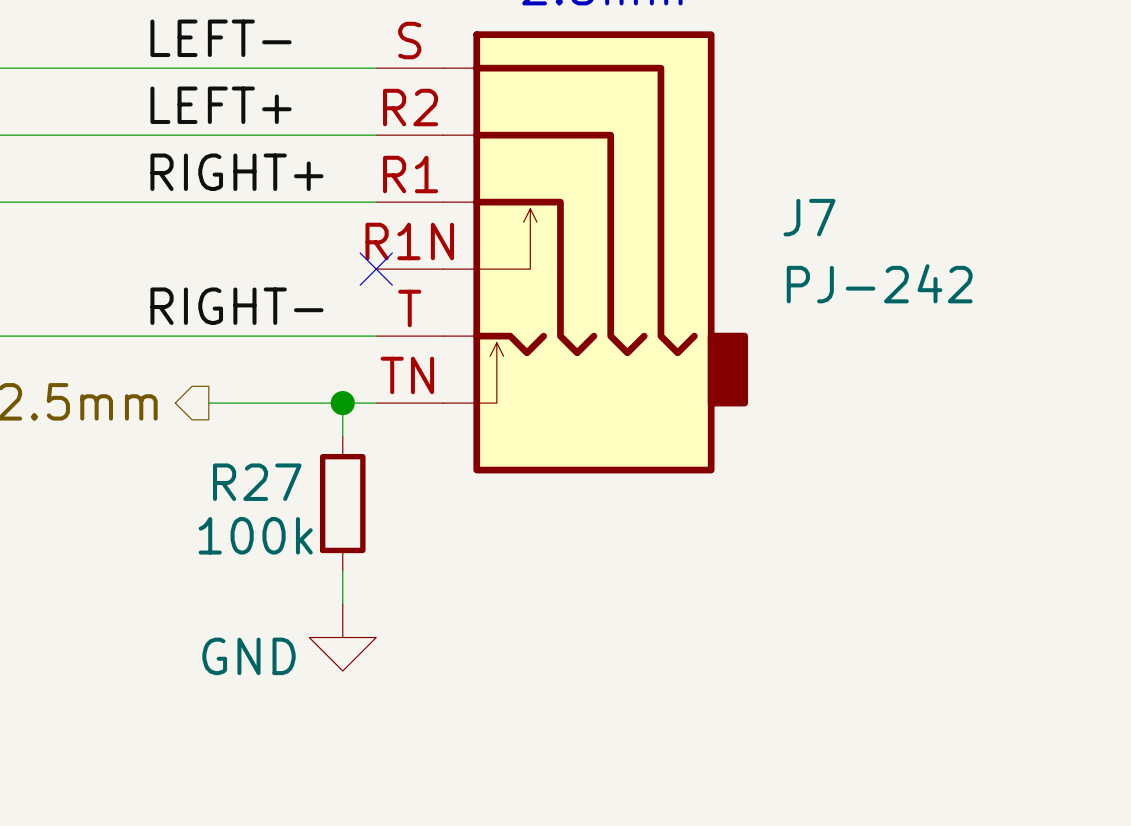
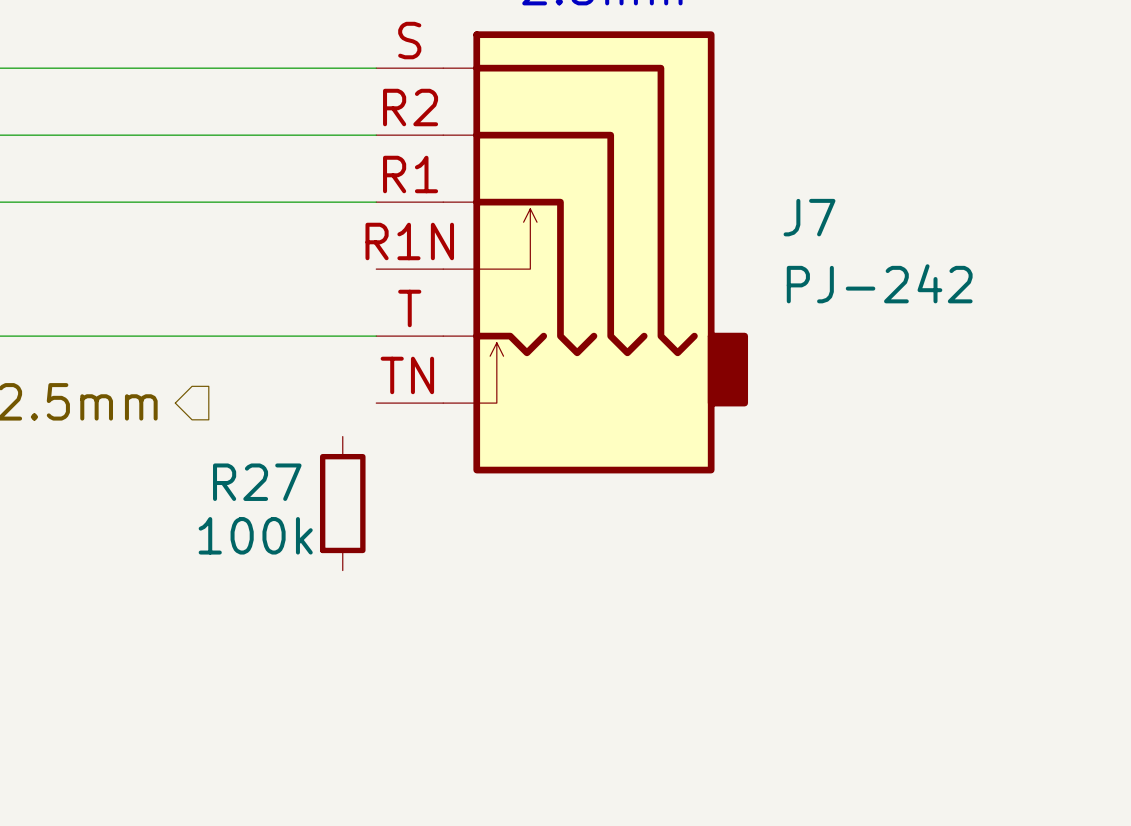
label: LEFT- (221, 38) -> none
label: LEFT+ (221, 105) -> none
label: RIGHT+ (236, 172) -> none
no-connect mark: (376, 269) -> none
label: RIGHT- (236, 306) -> none
wire: (208, 403) (376, 403) -> none
wire: (342, 403) (342, 436) -> none
junction: (342, 403) -> none
wire: (342, 570) (342, 604) -> none
power symbol: GND (342, 637) -> none

